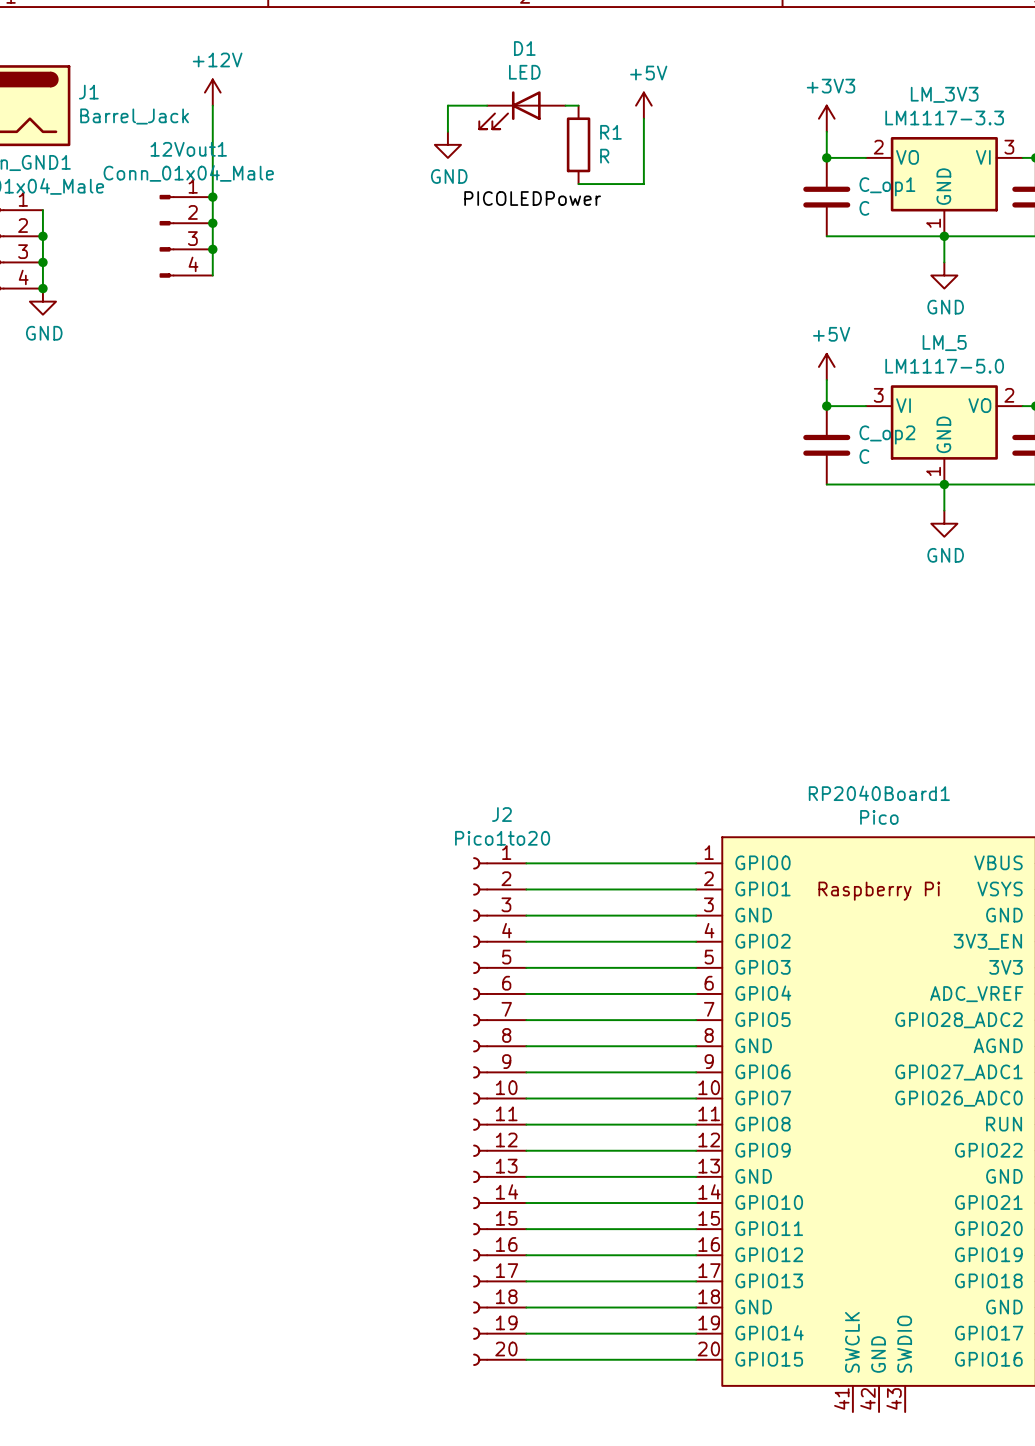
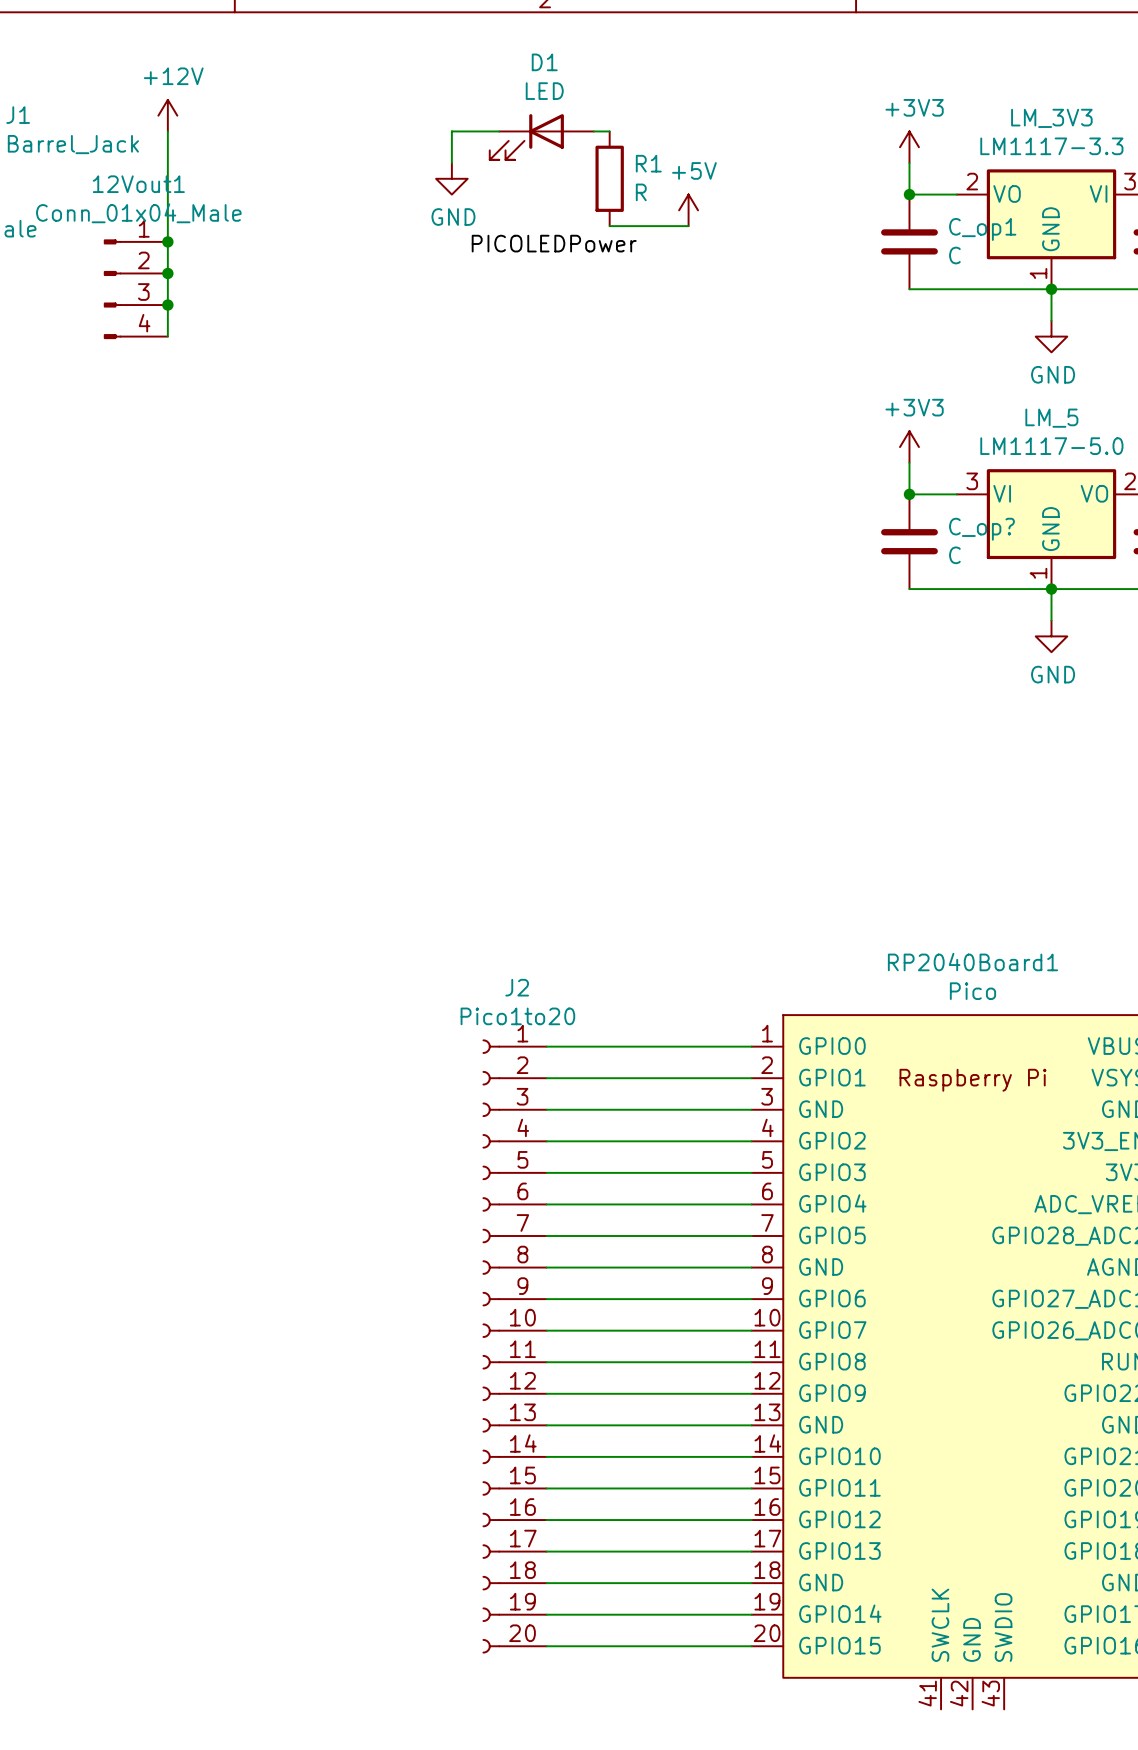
power symbol position: +5V (643, 105) -> +5V (688, 210)
wire: (643, 118) (643, 184) -> none
power symbol: +5V (826, 366) -> +3V3 (909, 447)
C_op2 name: C_op2 (887, 434) -> C_op? (981, 529)

